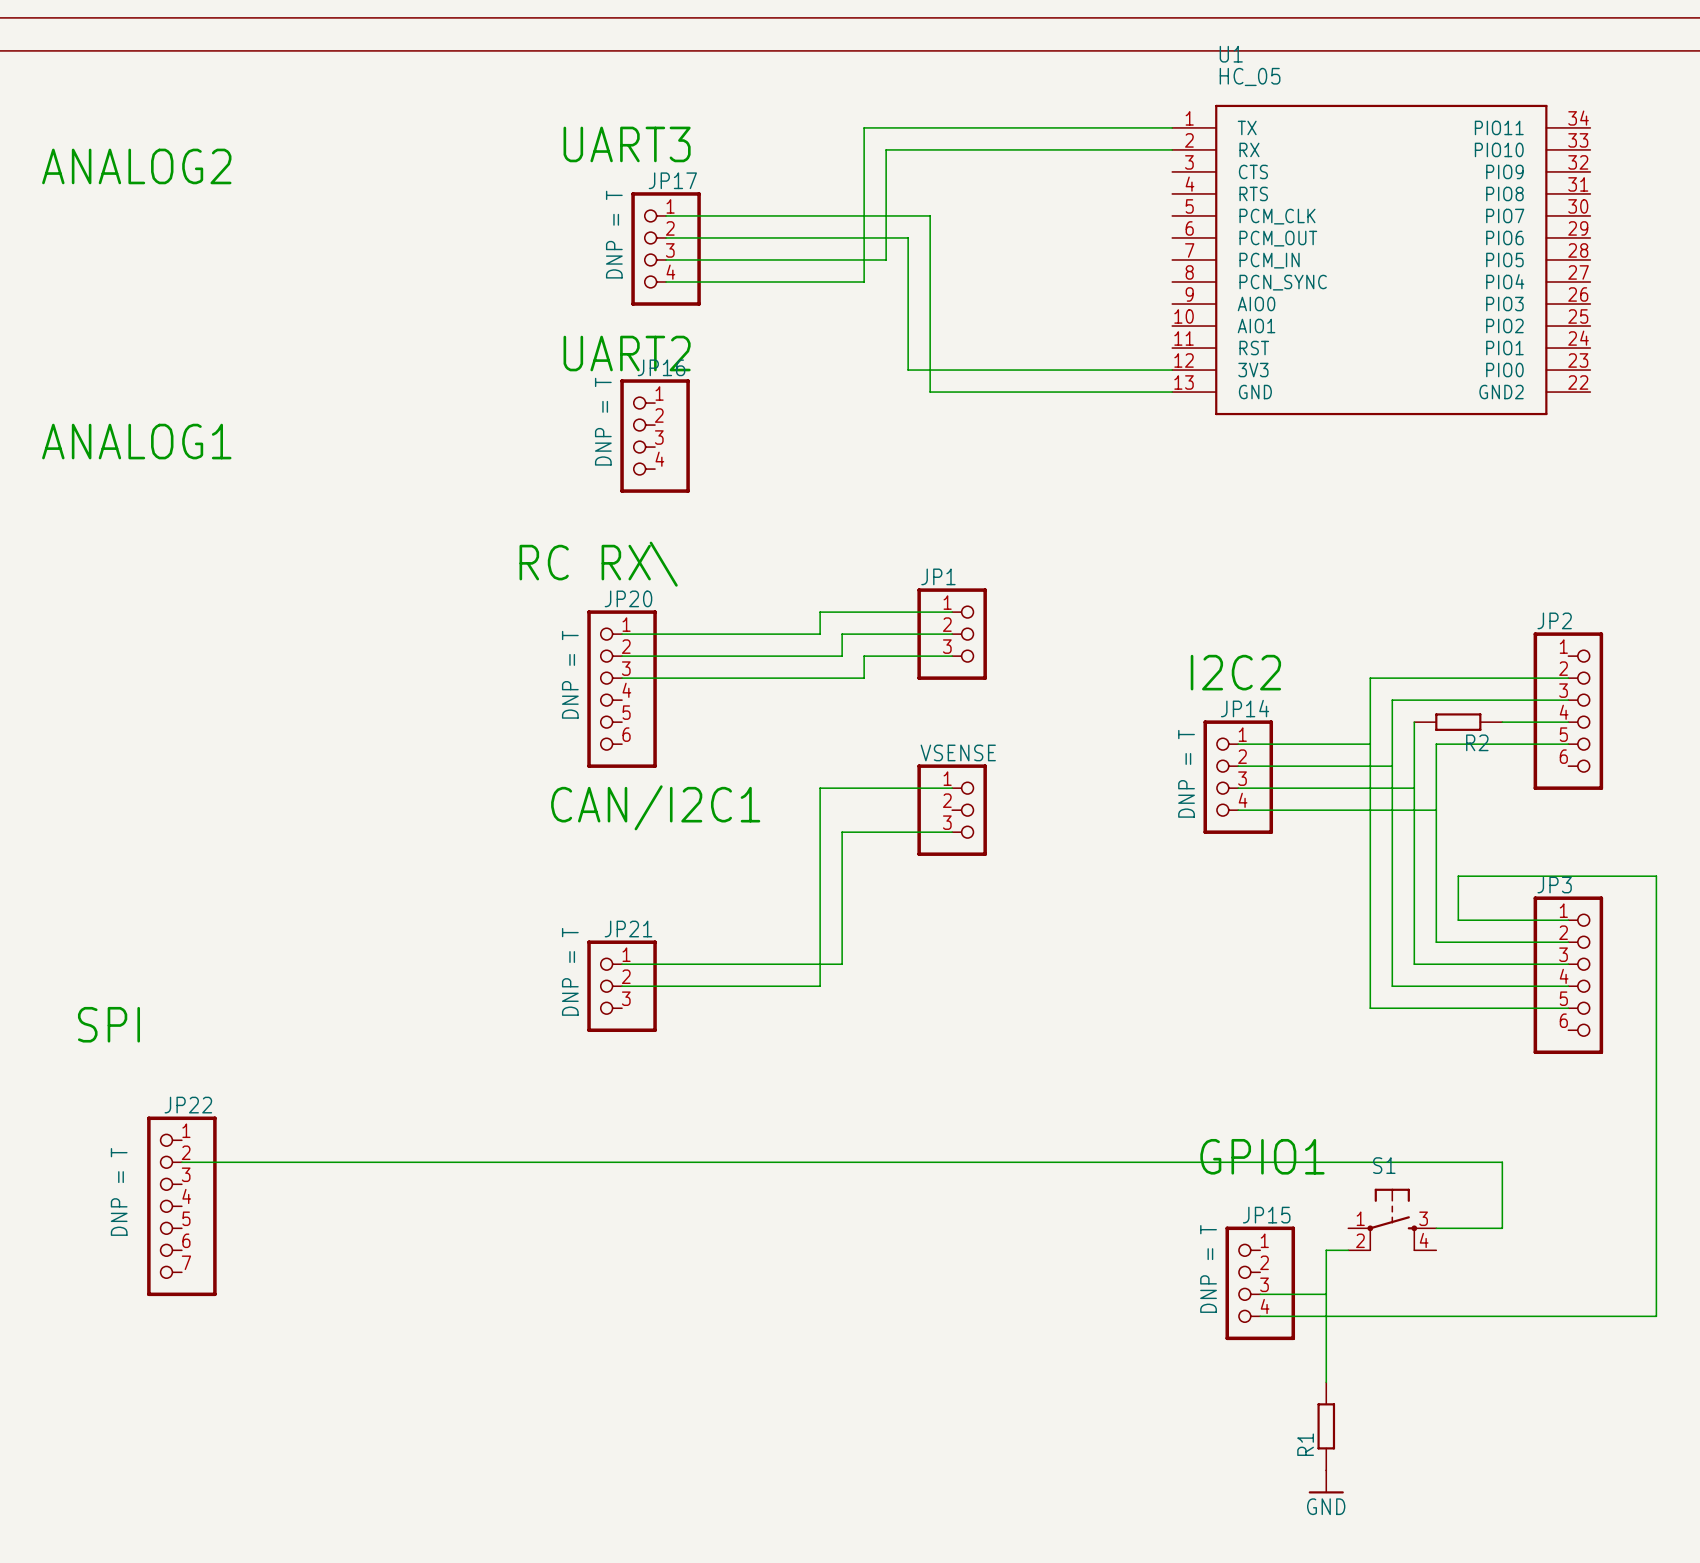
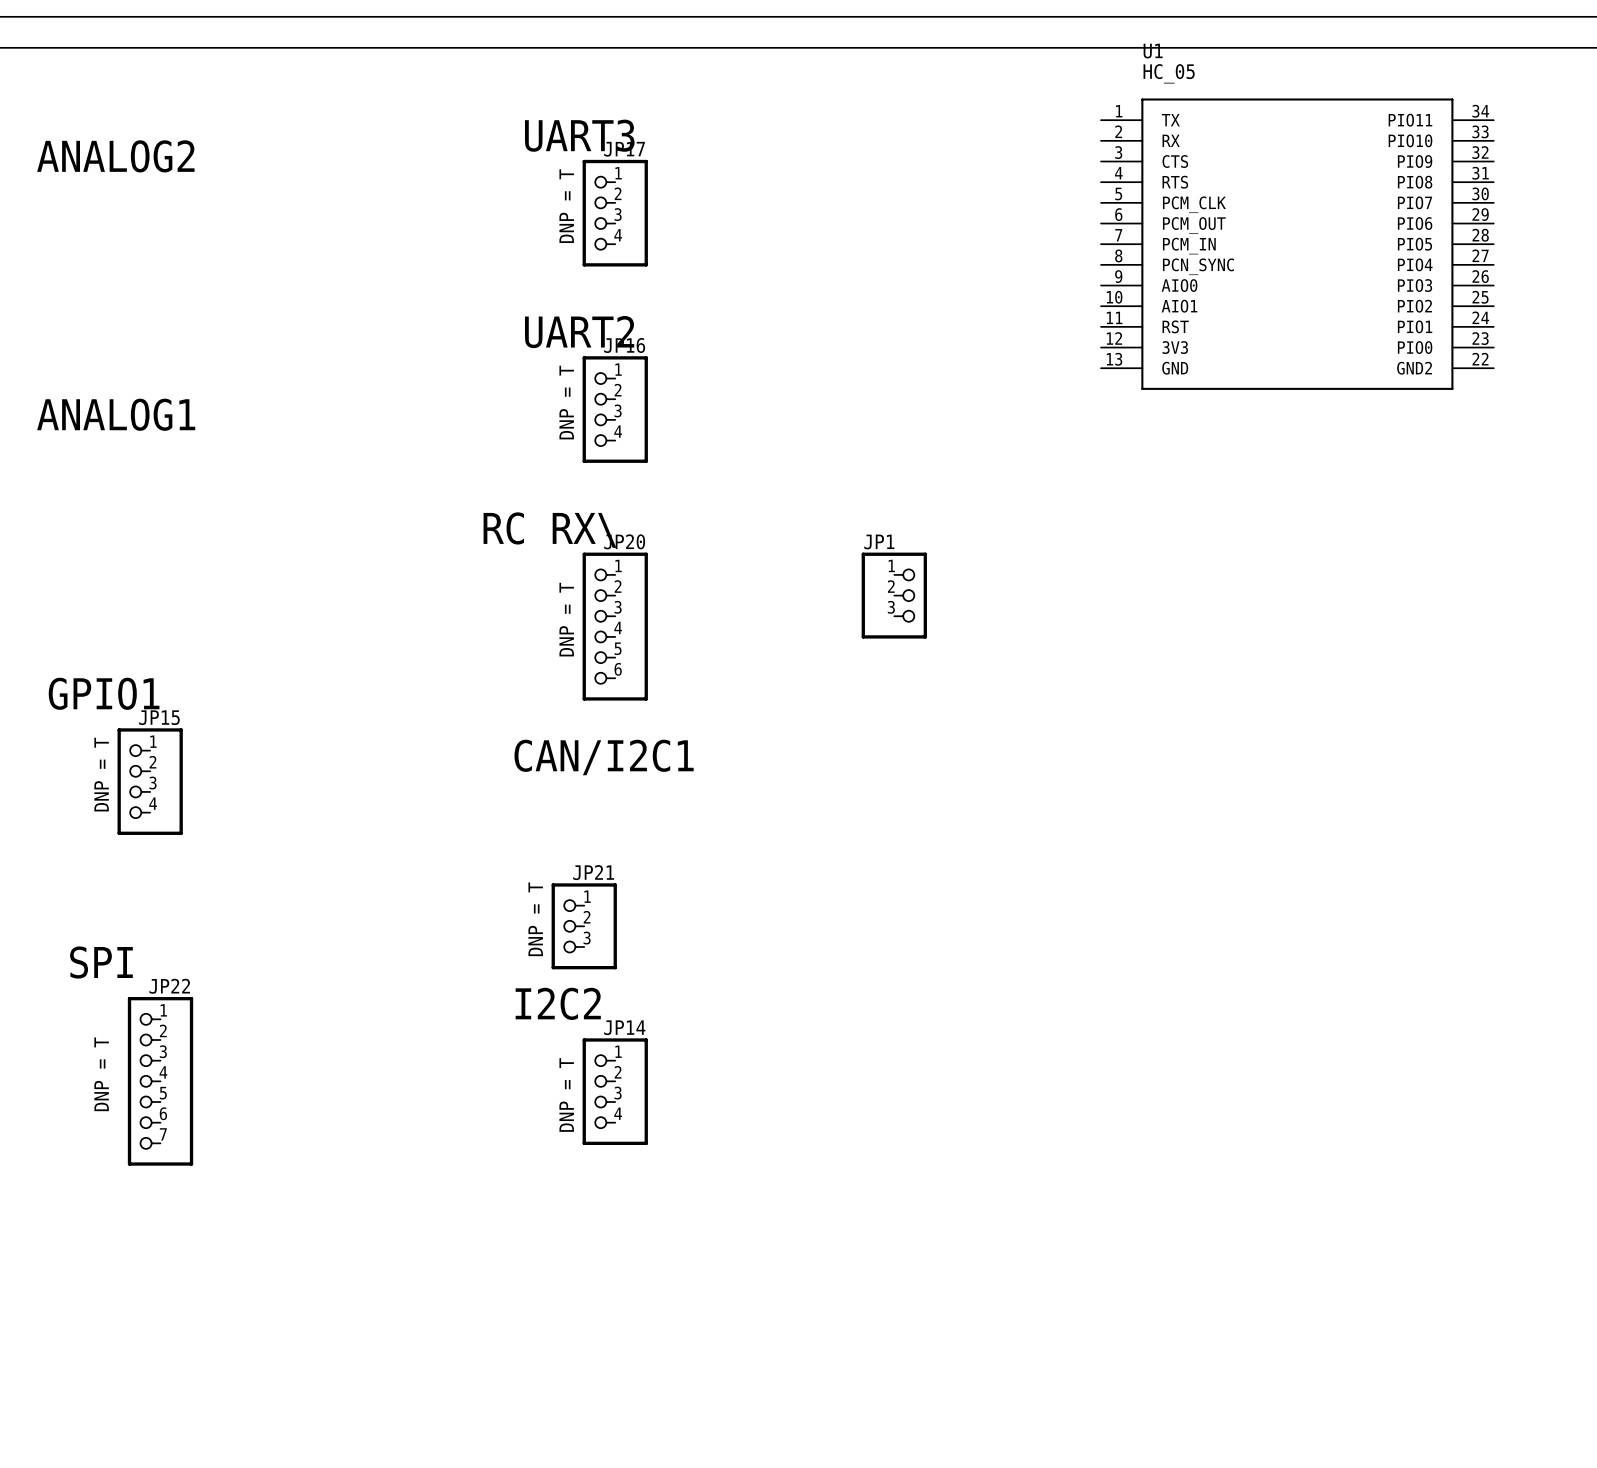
wire: (1172, 127) (864, 127) (864, 281) (666, 281) -> none
wire: (1172, 149) (886, 149) (886, 259) (666, 259) -> none
wire: (666, 215) (930, 215) (930, 392) (1172, 392) -> none
wire: (666, 237) (908, 237) (908, 370) (1172, 370) -> none
JP17 position: (666, 248) -> (615, 213)
wire: (952, 612) (820, 612) (820, 634) (622, 634) -> none
wire: (952, 634) (842, 634) (842, 656) (622, 656) -> none
wire: (952, 656) (864, 656) (864, 678) (622, 678) -> none
text: I2C2 (1235, 672) -> none
wire: (1568, 678) (1370, 678) (1370, 1008) (1568, 1008) -> none
JP20 position: (622, 689) -> (615, 626)
wire: (1568, 700) (1392, 700) (1392, 986) (1568, 986) -> none
JP2: (1568, 711) -> none
wire: (1414, 722) (1414, 964) (1568, 964) -> none
R2: (1458, 722) -> none
wire: (1502, 722) (1568, 722) -> none
text: none -> GPIO1 (104, 693)
wire: (1238, 744) (1370, 744) -> none
wire: (1568, 744) (1436, 744) (1436, 942) (1568, 942) -> none
wire: (1238, 766) (1392, 766) -> none
JP14 position: (1238, 777) -> (615, 1091)
wire: (952, 788) (820, 788) (820, 986) (622, 986) -> none
wire: (1238, 788) (1414, 788) -> none
VSENSE: (952, 810) -> none
wire: (1238, 810) (1436, 810) -> none
wire: (952, 832) (842, 832) (842, 964) (622, 964) -> none
wire: (1568, 920) (1458, 920) (1458, 876) (1656, 876) (1656, 1316) (1260, 1316) -> none
JP3: (1568, 975) -> none
text: none -> I2C2 (558, 1003)
text: GPIO1 (1262, 1156) -> none
wire: (181, 1162) (1502, 1162) (1502, 1228) (1436, 1228) -> none
JP22 position: (181, 1206) -> (160, 1081)
S1: (1392, 1219) -> none
wire: (1348, 1250) (1326, 1250) (1326, 1382) -> none
JP15 position: (1260, 1283) -> (150, 781)
wire: (1260, 1294) (1326, 1294) -> none
R1: (1326, 1426) -> none
power symbol: GND (1326, 1481) -> none

